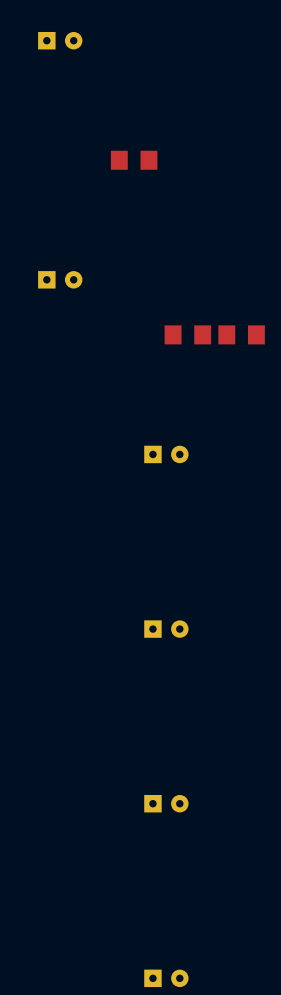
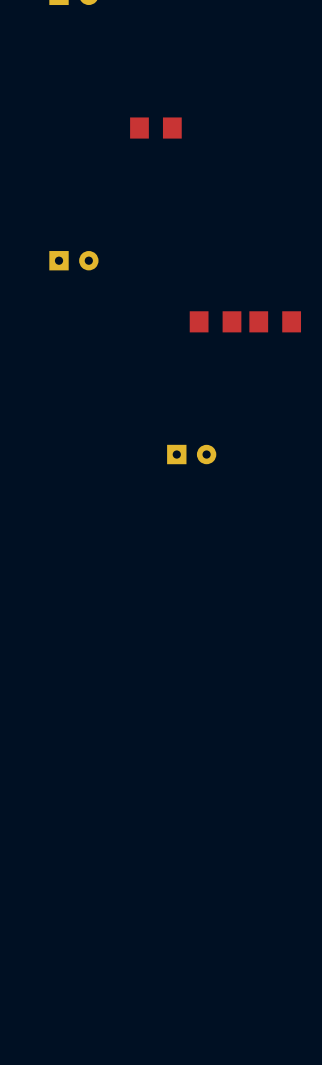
part: (166, 629) -> none
part: (166, 803) -> none
part: (166, 978) -> none

